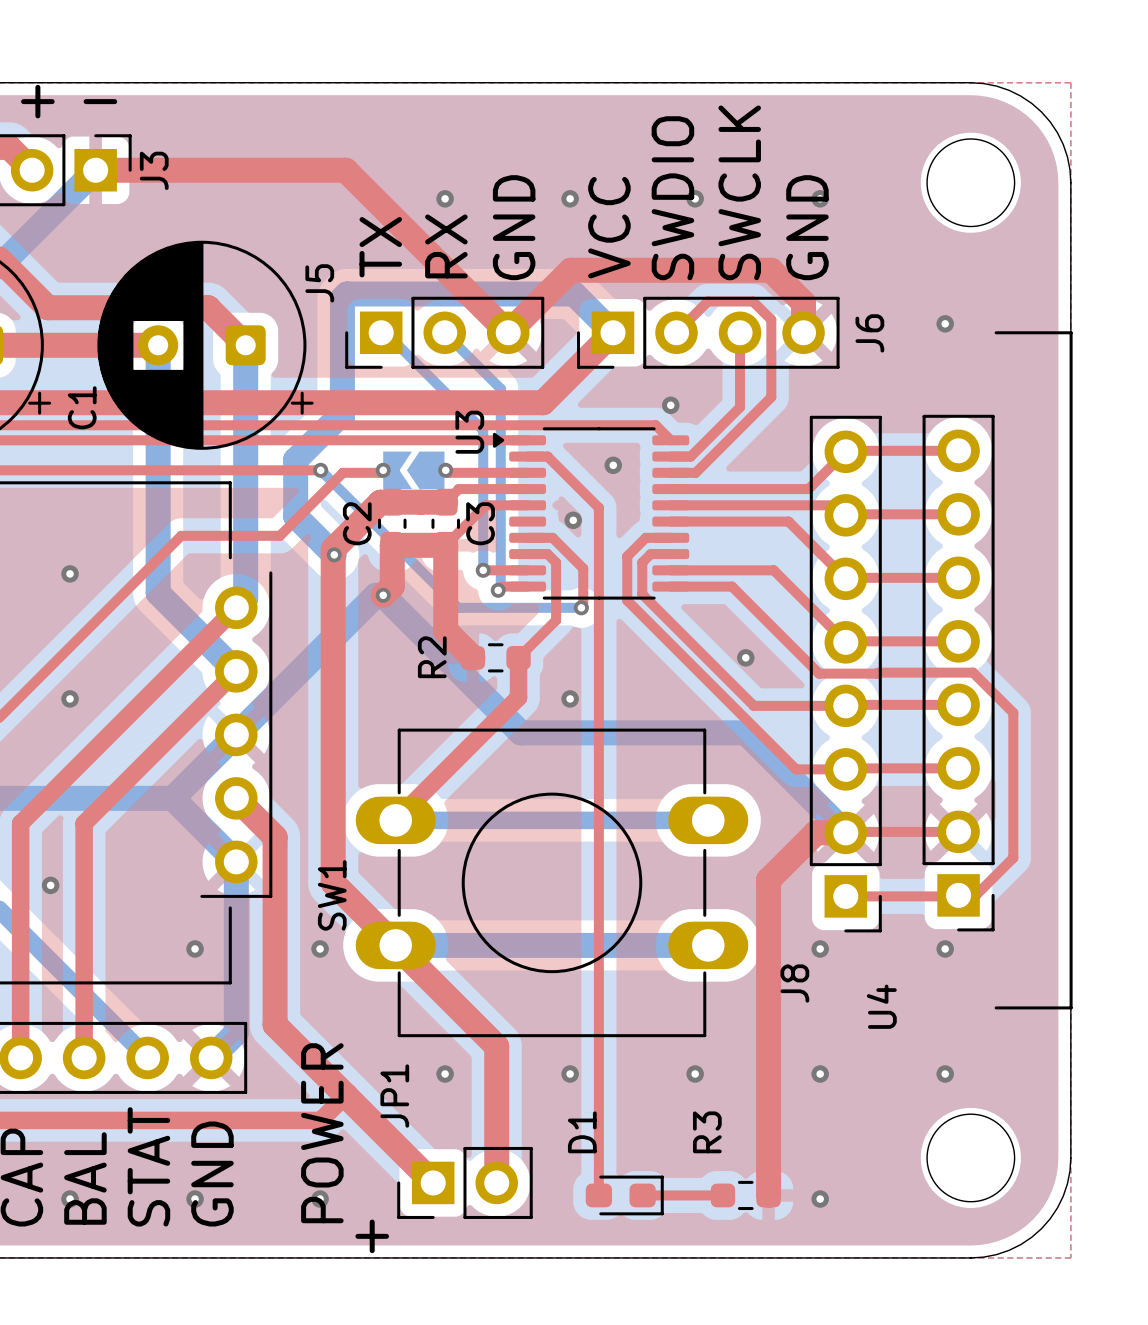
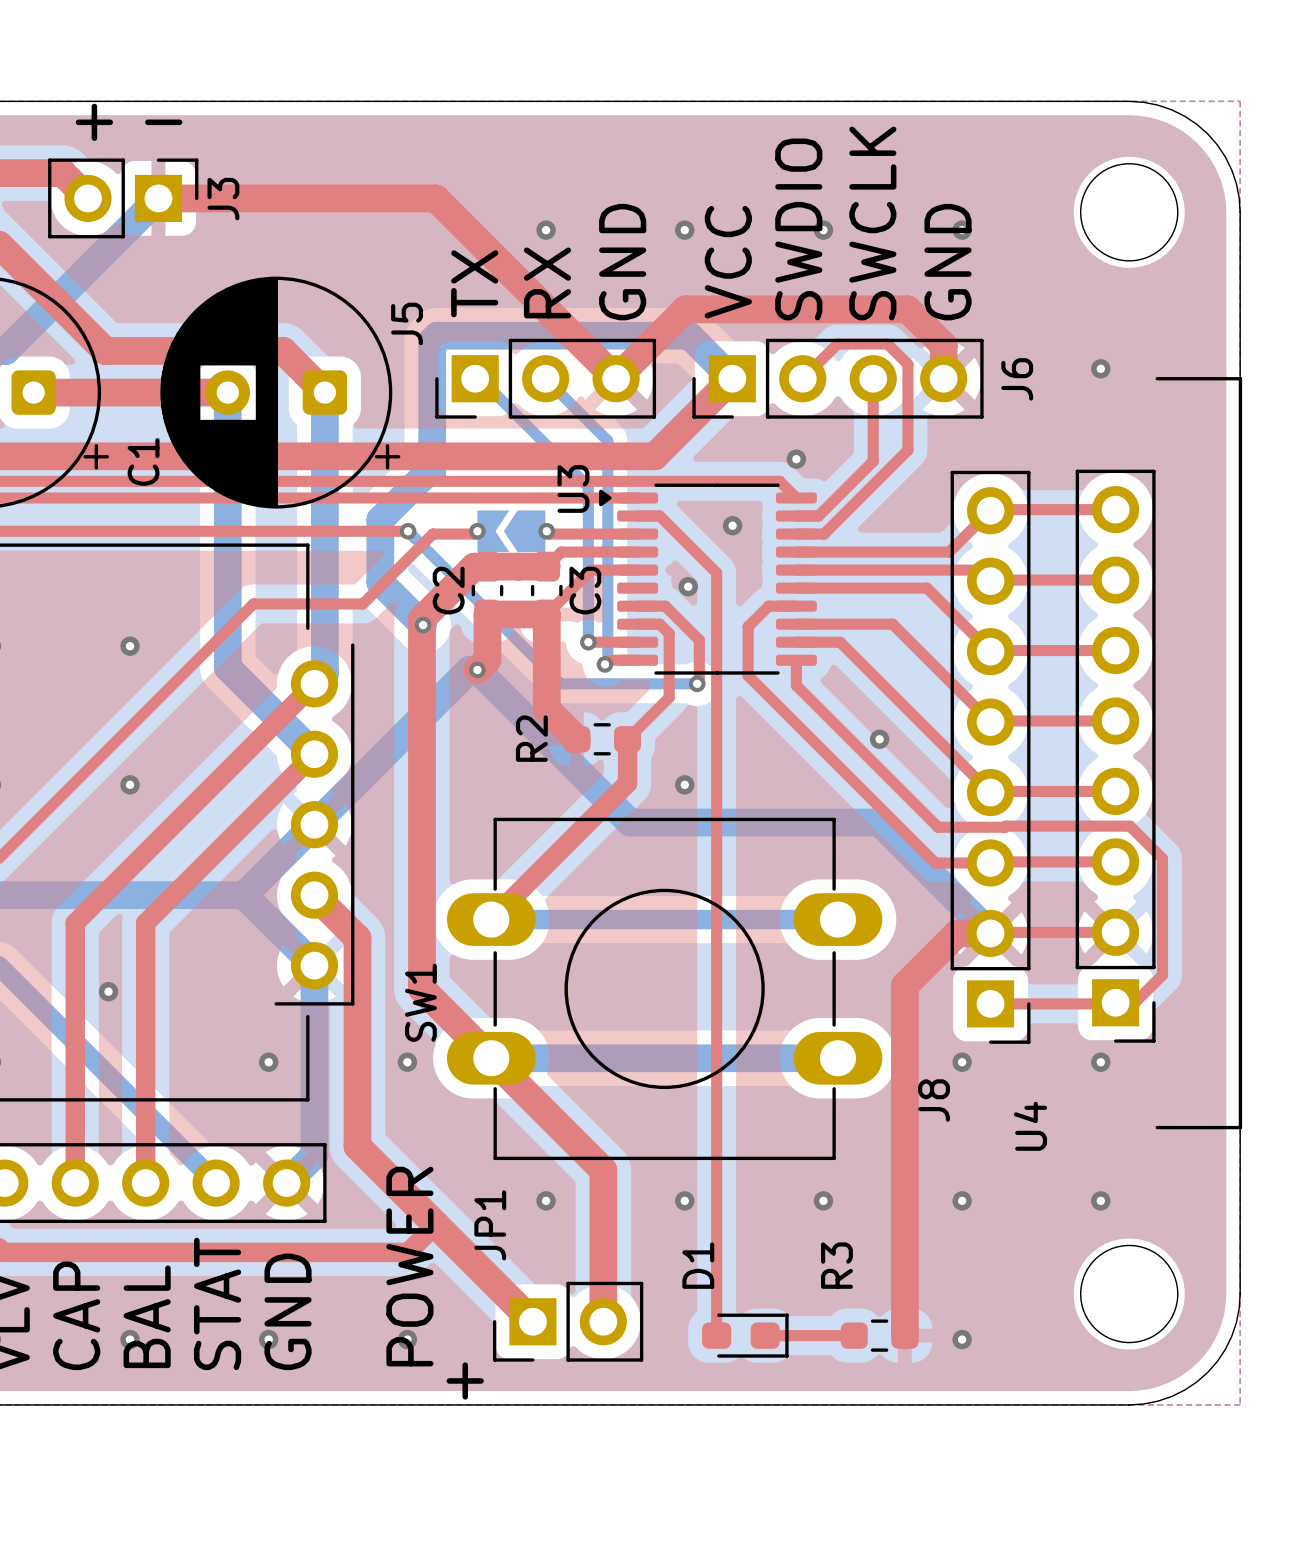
top track: (670, 554) (650, 554) (642, 562) (642, 594) (753, 705) (845, 705) -> (840, 642) (990, 792)
top track: (710, 570) (773, 570) -> (796, 624) (892, 624) (910, 642)
top track: (670, 586) (732, 586) (819, 673) (973, 672) (1013, 712) (1013, 857) (1000, 870) -> (796, 660) (796, 685) (938, 827) (1130, 826) (1162, 858) (1162, 975)

